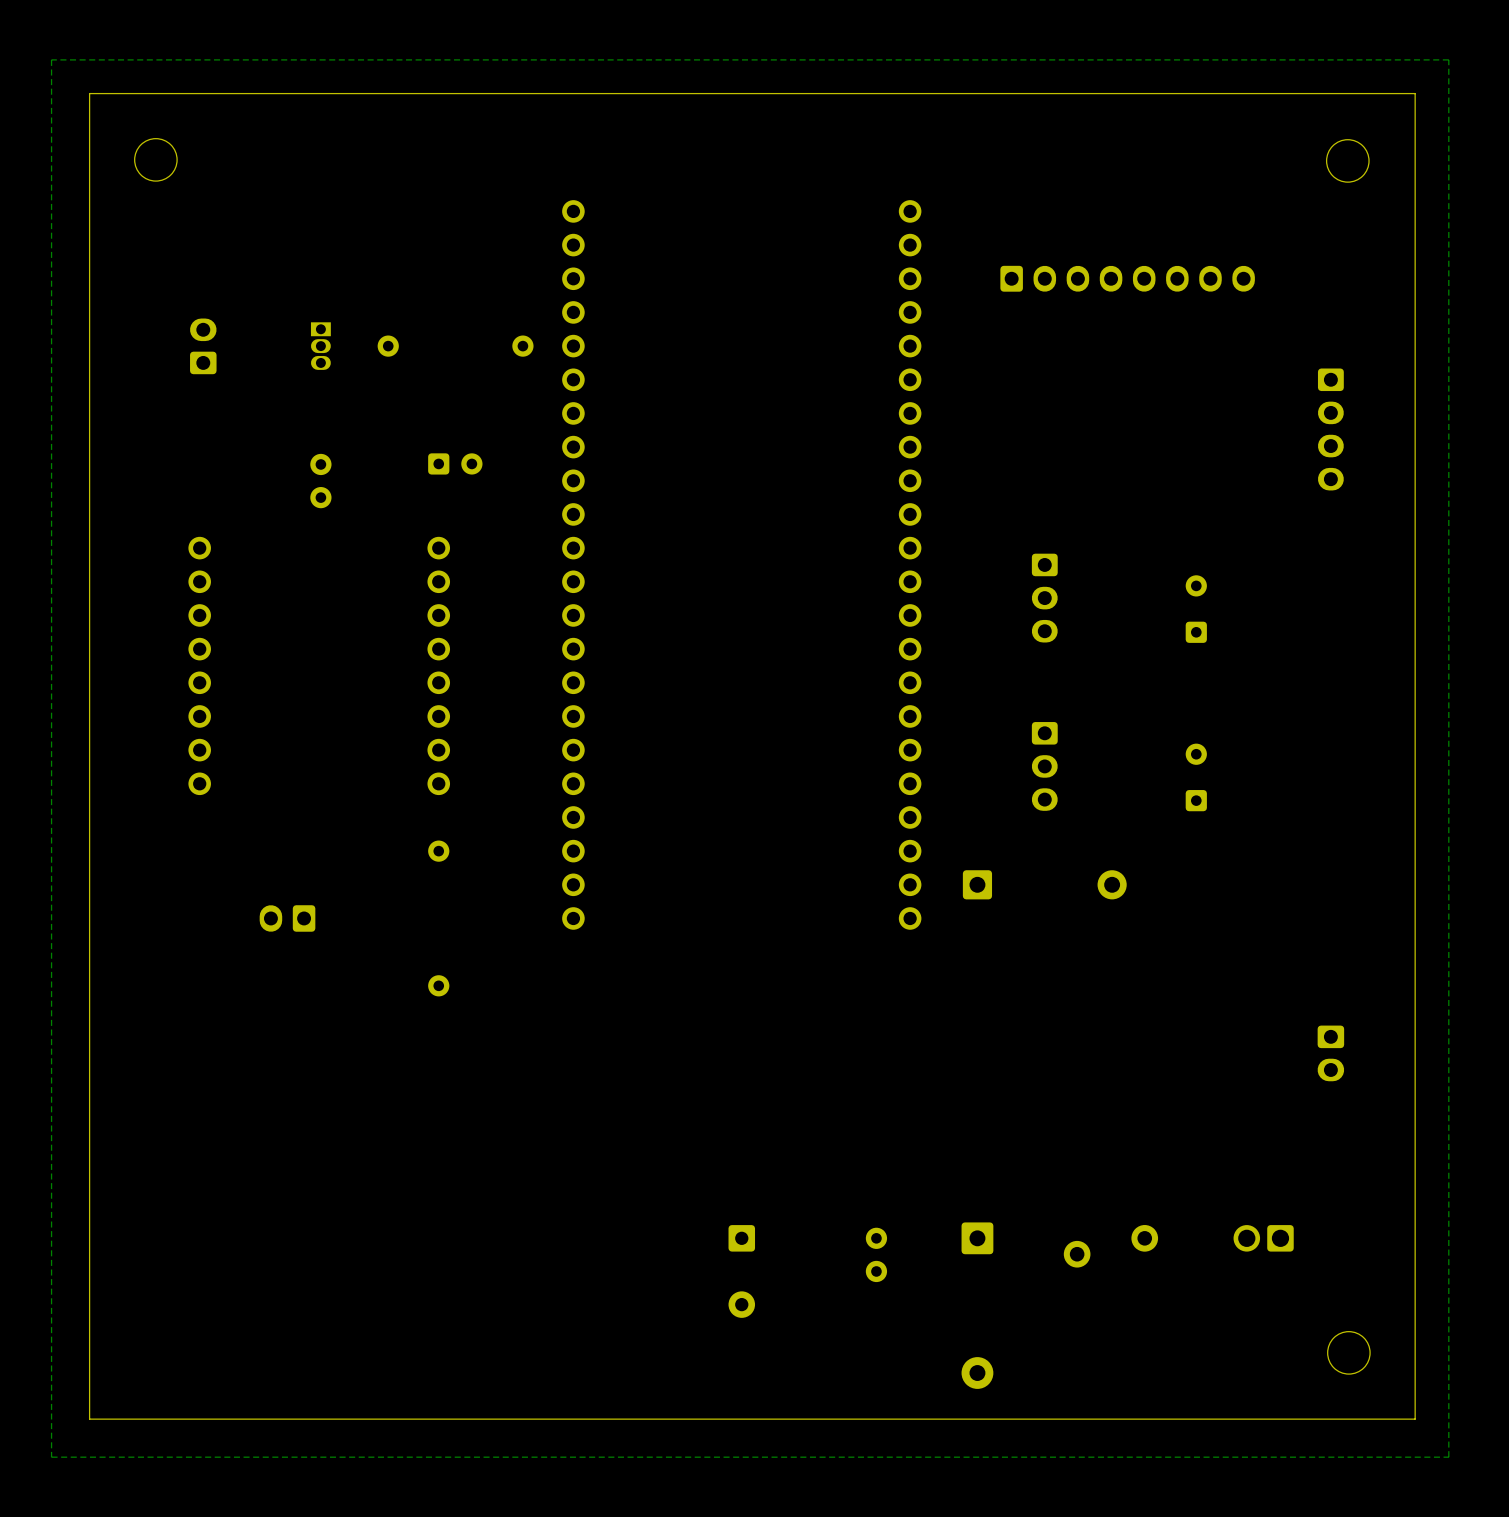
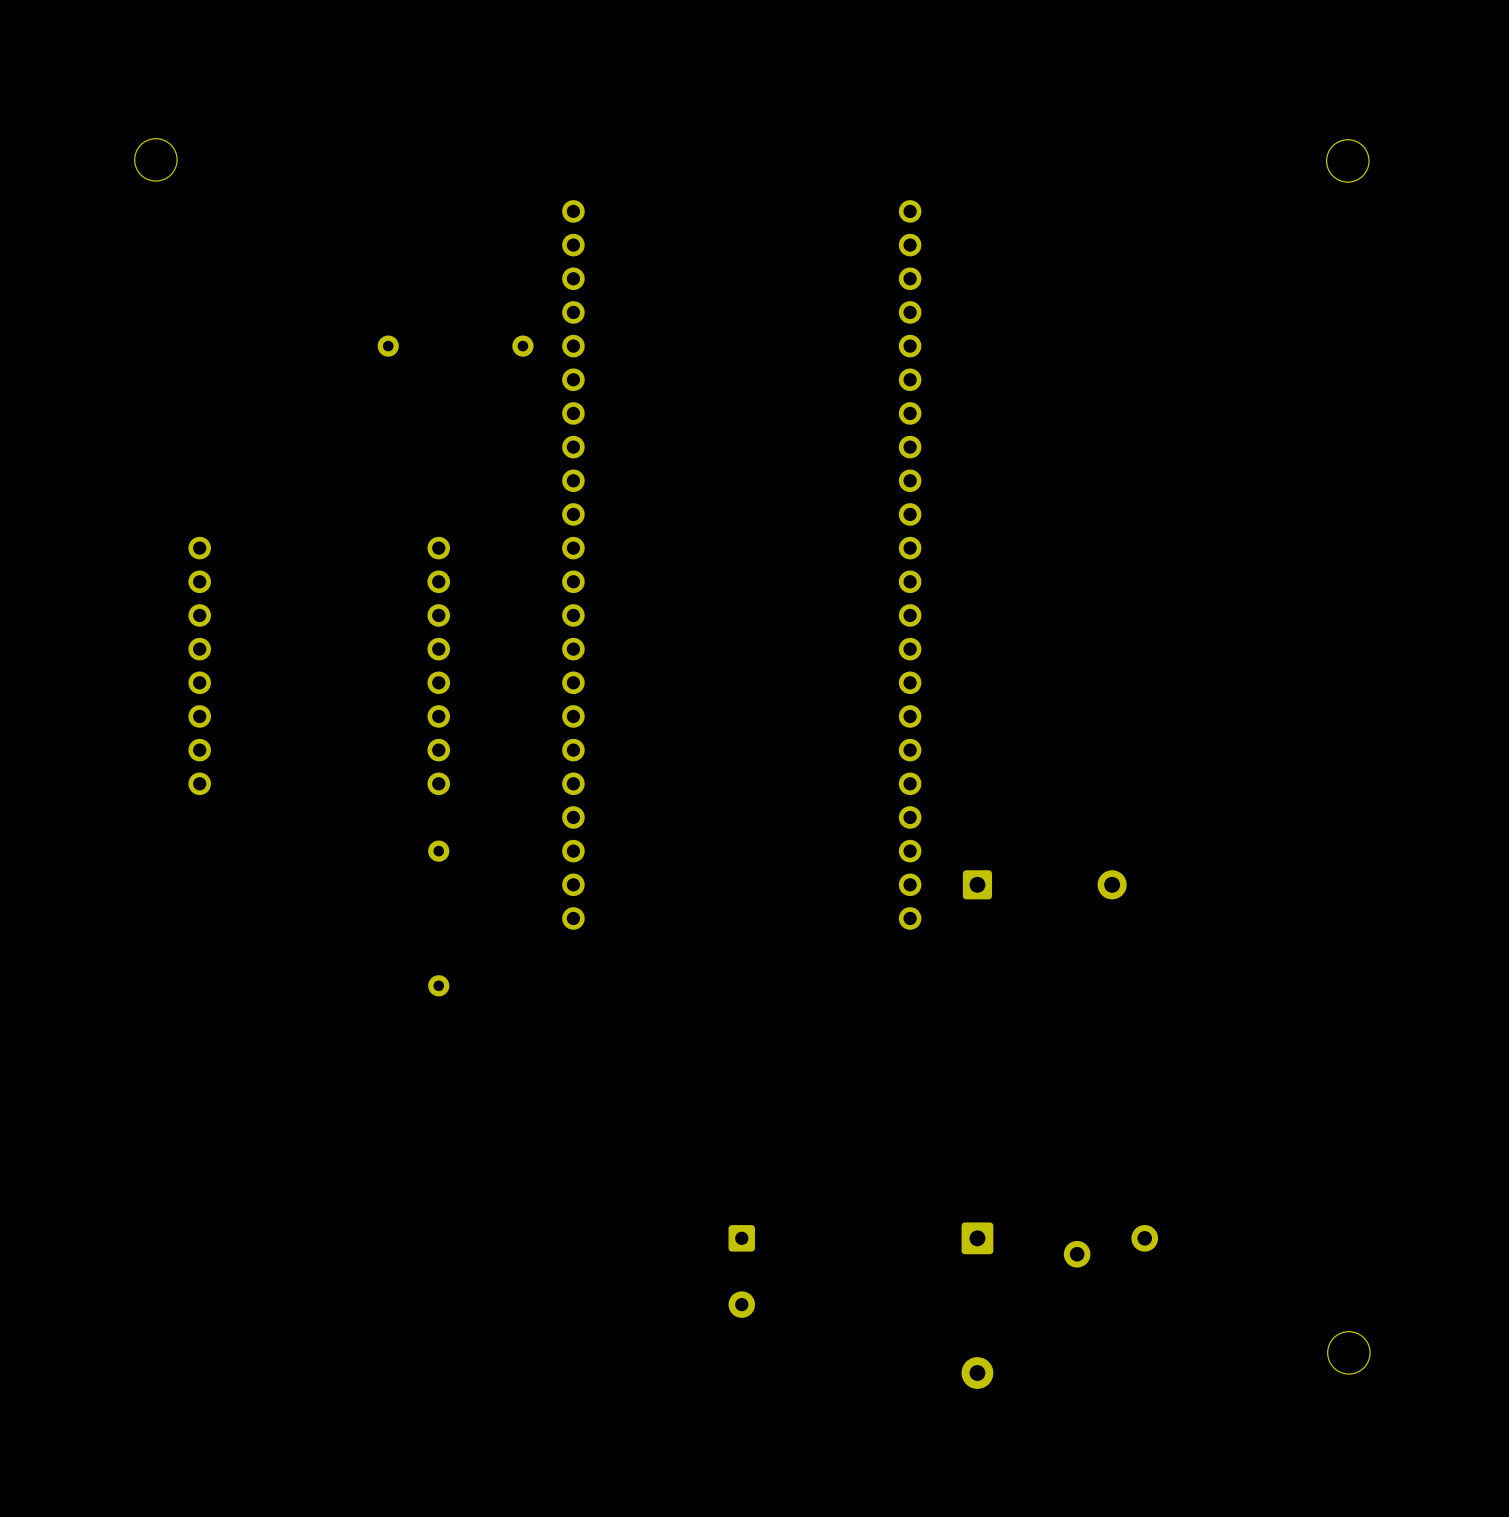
zone outline: (1448, 59) (51, 59) (51, 1457) (1448, 1457) (1448, 59) -> none
board edge: (1415, 93) (89, 93) (89, 1419) (1415, 1419) (1415, 93) -> none
part: (1127, 278) -> none
part: (203, 346) -> none
part: (320, 346) -> none
part: (1330, 429) -> none
part: (455, 463) -> none
part: (320, 481) -> none
part: (1044, 598) -> none
part: (1196, 609) -> none
part: (1044, 766) -> none
part: (1196, 777) -> none
part: (287, 918) -> none
part: (1330, 1053) -> none
part: (1263, 1238) -> none
part: (876, 1254) -> none

